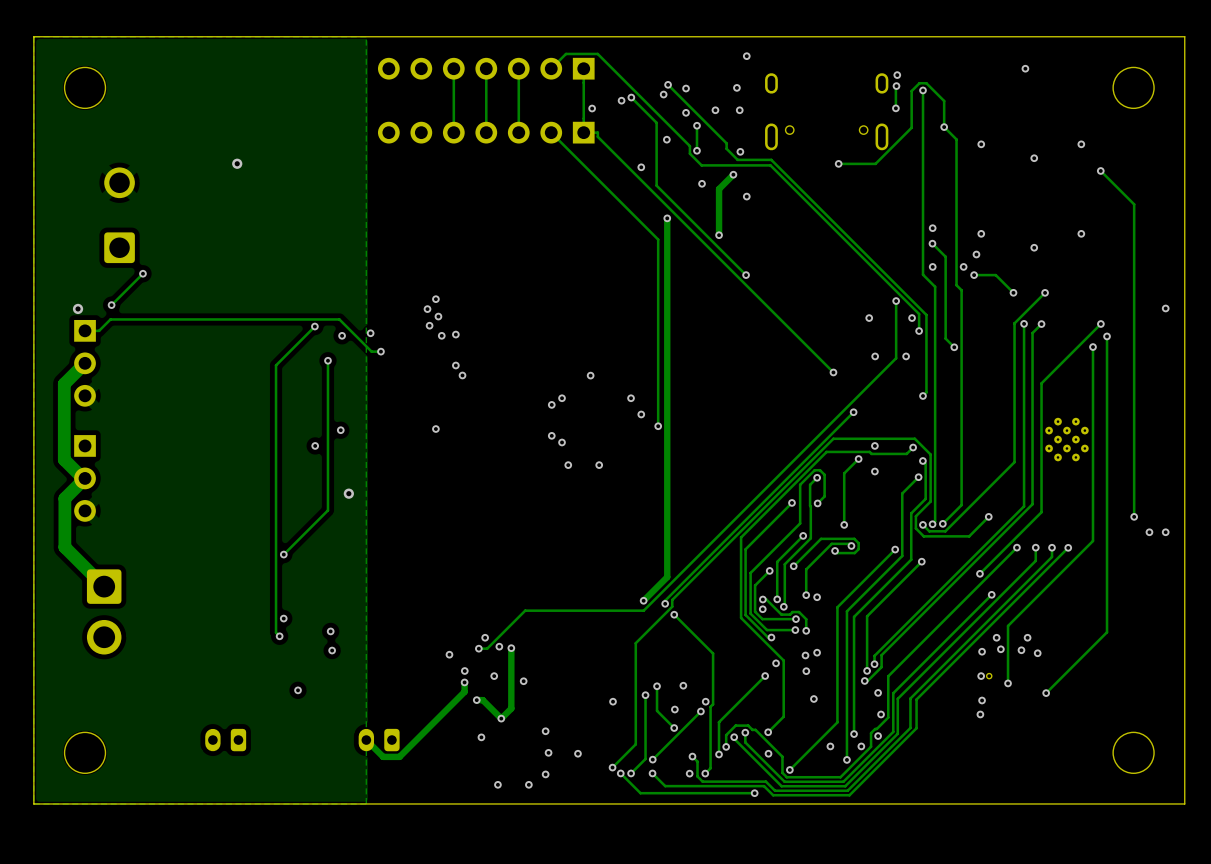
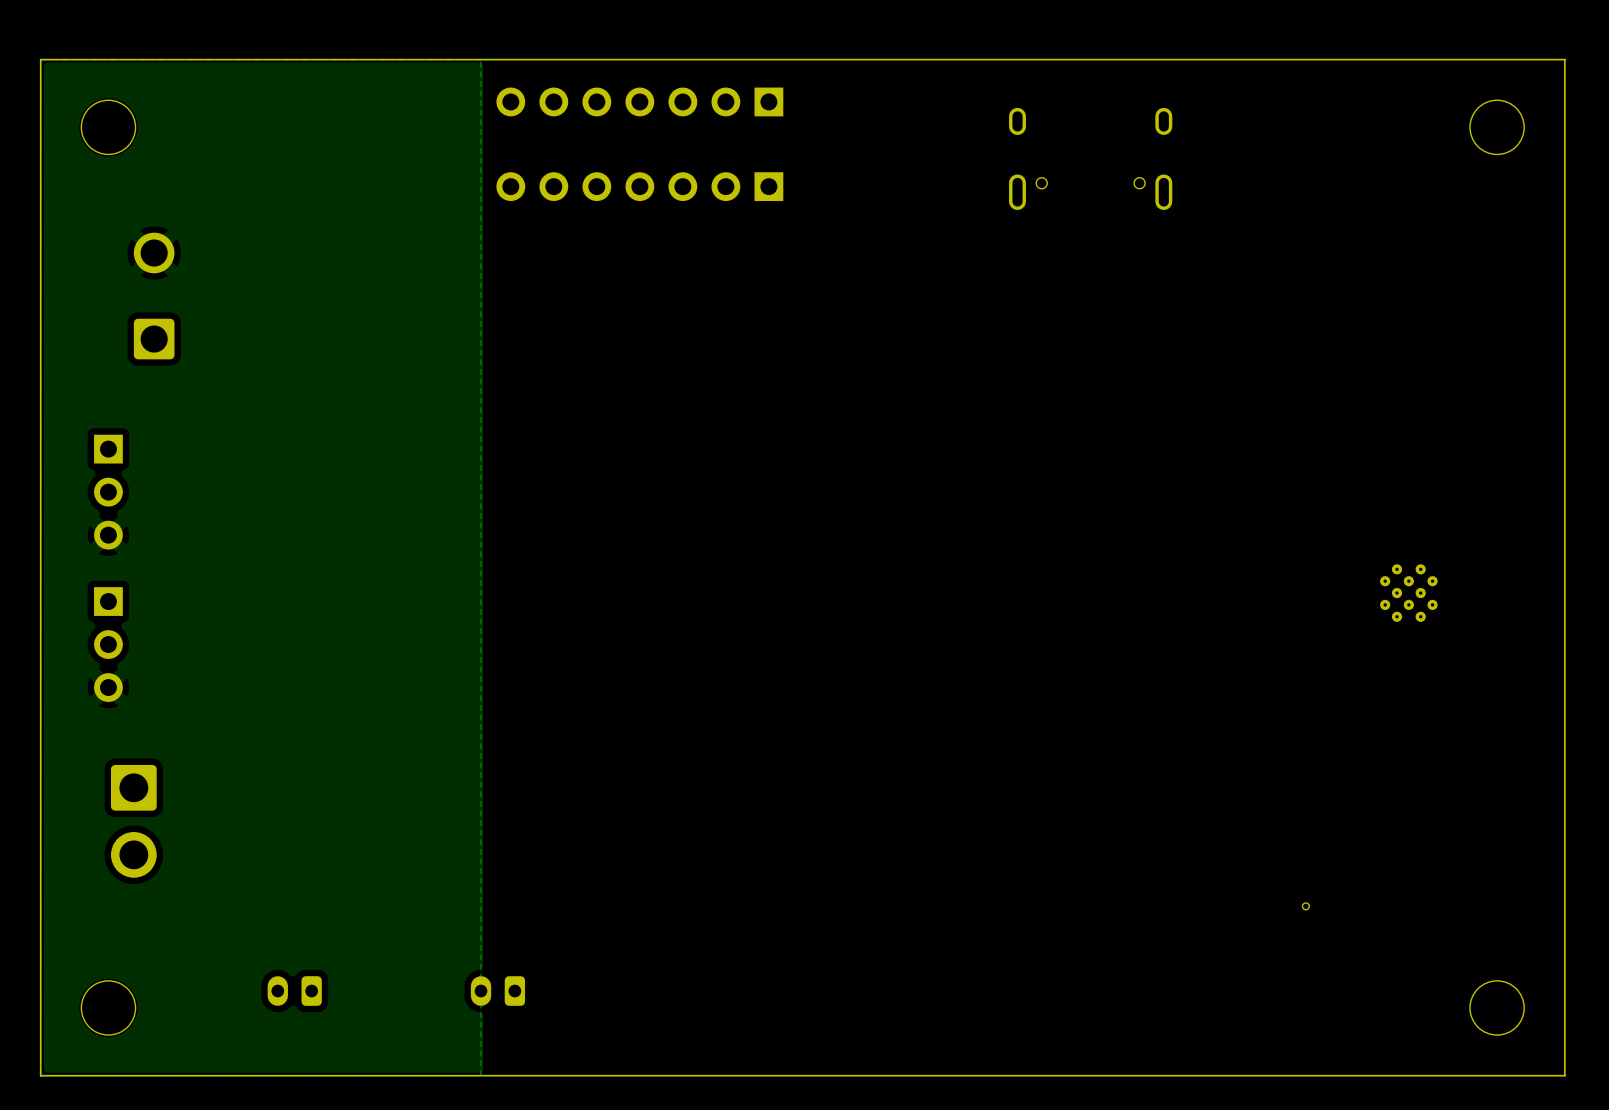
via: (746, 56) -> none
track: (453, 68) (453, 132) -> none
track: (486, 68) (486, 132) -> none
track: (518, 68) (518, 132) -> none
track: (551, 68) (566, 53) (597, 53) (689, 146) (689, 153) (701, 165) (770, 165) (919, 314) (919, 331) -> none
track: (583, 68) (583, 132) (597, 132) (597, 136) (833, 372) -> none
via: (1025, 68) -> none
via: (897, 75) -> none
track: (668, 84) (726, 143) (726, 148) (737, 159) (771, 159) (926, 315) (926, 392) (922, 396) -> none
via: (668, 84) -> none
track: (896, 86) (895, 108) -> none
via: (896, 86) -> none
via: (736, 87) -> none
via: (686, 88) -> none
track: (923, 90) (923, 274) (935, 286) (935, 521) (932, 524) -> none
via: (923, 90) -> none
via: (663, 94) -> none
track: (631, 97) (656, 122) (656, 185) (746, 275) -> none
via: (631, 97) -> none
via: (621, 100) -> none
via: (592, 108) -> none
via: (895, 108) -> none
via: (715, 110) -> none
via: (739, 110) -> none
via: (686, 112) -> none
track: (696, 125) (696, 150) -> none
via: (697, 125) -> none
via: (944, 127) -> none
track: (551, 132) (658, 239) (658, 426) -> none
via: (666, 139) -> none
via: (981, 144) -> none
via: (1081, 144) -> none
via: (696, 150) -> none
via: (740, 151) -> none
via: (1034, 158) -> none
via: (237, 163) -> none
track: (838, 163) (875, 163) (911, 127) (911, 91) (919, 83) (926, 83) (944, 101) (944, 127) (956, 139) (956, 285) (961, 290) (961, 505) (942, 523) -> none
via: (838, 163) -> none
via: (641, 167) -> none
track: (1100, 170) (1134, 204) (1134, 516) -> none
via: (1100, 170) -> none
track: (733, 174) (719, 189) (719, 235) -> none
via: (733, 174) -> none
via: (702, 183) -> none
via: (746, 196) -> none
track: (667, 218) (667, 577) (643, 600) -> none
via: (667, 218) -> none
via: (932, 228) -> none
via: (981, 233) -> none
via: (1081, 233) -> none
via: (719, 235) -> none
track: (932, 243) (945, 256) (945, 338) (954, 347) -> none
via: (932, 243) -> none
via: (1034, 247) -> none
via: (976, 254) -> none
via: (932, 266) -> none
via: (963, 266) -> none
track: (142, 273) (111, 305) -> none
via: (142, 273) -> none
via: (746, 275) -> none
track: (974, 275) (995, 275) (1013, 292) -> none
via: (974, 275) -> none
via: (1013, 292) -> none
track: (1045, 292) (1014, 323) (1014, 462) (945, 531) (929, 531) (922, 524) -> none
via: (1045, 292) -> none
via: (435, 299) -> none
track: (896, 301) (896, 358) (643, 610) (525, 610) (487, 648) (478, 648) -> none
via: (896, 301) -> none
via: (111, 305) -> none
via: (78, 308) -> none
via: (1165, 308) -> none
via: (427, 309) -> none
via: (438, 316) -> none
via: (869, 318) -> none
via: (912, 318) -> none
track: (1024, 323) (1024, 506) (874, 655) (874, 664) -> none
via: (1024, 323) -> none
track: (1100, 323) (1041, 383) (1041, 512) (979, 573) -> none
via: (1100, 323) -> none
track: (1041, 324) (1032, 333) (1032, 504) (881, 655) (881, 667) (867, 680) (864, 680) -> none
via: (1041, 324) -> none
via: (429, 325) -> none
track: (314, 326) (276, 365) (276, 632) (279, 636) -> none
via: (314, 326) -> none
track: (85, 330) (99, 330) (110, 319) (339, 319) (371, 351) (380, 351) -> none
via: (919, 331) -> none
via: (370, 333) -> none
via: (455, 334) -> none
via: (342, 335) -> none
via: (441, 335) -> none
track: (1107, 336) (1107, 632) (1046, 693) -> none
via: (1107, 336) -> none
via: (954, 347) -> none
track: (1093, 347) (1093, 540) (1008, 625) (1008, 683) -> none
via: (1093, 347) -> none
via: (380, 351) -> none
via: (875, 356) -> none
via: (906, 356) -> none
track: (327, 360) (327, 510) (283, 554) -> none
via: (327, 360) -> none
track: (85, 363) (64, 384) (64, 459) (84, 479) -> none
via: (455, 365) -> none
via: (833, 372) -> none
via: (462, 375) -> none
via: (590, 375) -> none
via: (922, 396) -> none
via: (562, 398) -> none
via: (631, 398) -> none
via: (551, 404) -> none
track: (853, 412) (665, 600) (665, 603) -> none
via: (853, 412) -> none
via: (641, 414) -> none
via: (658, 426) -> none
via: (435, 429) -> none
via: (340, 430) -> none
via: (551, 435) -> none
via: (562, 442) -> none
via: (315, 445) -> none
via: (874, 445) -> none
track: (913, 447) (906, 453) (826, 451) (741, 537) (741, 617) (783, 660) (783, 716) (768, 732) -> none
via: (913, 447) -> none
track: (858, 459) (844, 473) (844, 524) -> none
via: (858, 459) -> none
track: (922, 460) (925, 463) (925, 498) (911, 513) (911, 559) (854, 616) (854, 734) -> none
via: (922, 460) -> none
via: (568, 465) -> none
via: (599, 465) -> none
via: (874, 471) -> none
track: (817, 477) (810, 484) (810, 538) (784, 564) (783, 606) -> none
via: (817, 477) -> none
track: (918, 477) (902, 493) (902, 556) (846, 611) (846, 759) -> none
via: (918, 477) -> none
track: (84, 479) (64, 498) (64, 547) (104, 586) -> none
via: (348, 493) -> none
track: (791, 502) (745, 549) (745, 615) (768, 637) (771, 637) -> none
via: (791, 502) -> none
track: (817, 503) (824, 496) (824, 474) (820, 470) (814, 470) (800, 484) (800, 523) (750, 573) (750, 613) (767, 630) (795, 630) -> none
via: (817, 503) -> none
track: (988, 516) (969, 536) (923, 536) (915, 528) (915, 516) (930, 501) (930, 454) (914, 438) (833, 438) (672, 599) (672, 606) (635, 643) (635, 744) (612, 767) -> none
via: (988, 516) -> none
via: (1134, 516) -> none
via: (942, 523) -> none
via: (844, 524) -> none
via: (922, 524) -> none
via: (932, 524) -> none
via: (1149, 532) -> none
via: (1165, 532) -> none
track: (803, 535) (777, 561) (777, 599) -> none
via: (803, 535) -> none
track: (851, 545) (849, 543) (831, 543) (806, 569) (806, 595) -> none
via: (851, 545) -> none
track: (1016, 547) (888, 676) (888, 717) (871, 733) (871, 746) (840, 777) (786, 777) (782, 772) (782, 756) (755, 729) (752, 729) (748, 725) (735, 725) (726, 735) (726, 746) -> none
via: (1016, 547) -> none
track: (1035, 547) (1035, 560) (897, 698) (897, 733) (845, 786) (781, 786) (734, 737) -> none
via: (1035, 547) -> none
track: (1052, 547) (1052, 556) (910, 698) (910, 727) (847, 790) (775, 790) (765, 781) (702, 781) (697, 776) (697, 761) (692, 756) -> none
via: (1052, 547) -> none
track: (1068, 547) (916, 699) (916, 728) (849, 795) (773, 795) (764, 786) (665, 786) (652, 773) -> none
via: (1068, 547) -> none
track: (895, 549) (837, 607) (837, 722) (789, 769) -> none
via: (895, 549) -> none
track: (835, 550) (837, 553) (854, 553) (858, 549) (858, 543) (854, 538) (821, 538) (793, 566) -> none
via: (835, 550) -> none
via: (283, 554) -> none
track: (921, 561) (867, 616) (867, 670) -> none
via: (921, 561) -> none
via: (793, 566) -> none
track: (769, 570) (755, 585) (755, 611) (762, 619) (795, 619) -> none
via: (769, 570) -> none
via: (979, 573) -> none
track: (991, 594) (893, 693) (893, 731) (843, 781) (784, 781) (745, 742) (745, 732) -> none
via: (991, 594) -> none
via: (806, 595) -> none
via: (817, 597) -> none
track: (762, 599) (766, 599) (781, 614) (799, 612) (806, 619) (806, 630) -> none
via: (762, 599) -> none
via: (777, 599) -> none
via: (643, 600) -> none
via: (665, 603) -> none
via: (783, 606) -> none
via: (762, 609) -> none
track: (674, 614) (713, 653) (710, 768) (705, 773) -> none
via: (674, 614) -> none
via: (283, 618) -> none
via: (795, 619) -> none
via: (795, 630) -> none
via: (806, 630) -> none
via: (330, 631) -> none
via: (279, 636) -> none
via: (485, 637) -> none
via: (771, 637) -> none
via: (996, 637) -> none
via: (1027, 637) -> none
via: (499, 646) -> none
via: (478, 648) -> none
track: (511, 648) (511, 708) (501, 718) (482, 700) (476, 700) -> none
via: (511, 648) -> none
via: (1000, 649) -> none
via: (332, 650) -> none
via: (1021, 650) -> none
via: (982, 651) -> none
via: (817, 652) -> none
via: (1037, 653) -> none
via: (449, 654) -> none
via: (805, 655) -> none
via: (776, 663) -> none
via: (874, 664) -> none
via: (464, 670) -> none
via: (867, 670) -> none
via: (806, 671) -> none
via: (494, 676) -> none
track: (765, 676) (719, 722) (719, 754) -> none
via: (765, 676) -> none
via: (981, 676) -> none
via: (864, 680) -> none
via: (523, 681) -> none
track: (464, 682) (464, 691) (399, 756) (383, 756) (366, 740) -> none
via: (464, 682) -> none
via: (1008, 683) -> none
via: (683, 685) -> none
track: (657, 686) (657, 710) (674, 728) -> none
via: (657, 686) -> none
via: (298, 690) -> none
via: (878, 692) -> none
via: (1046, 693) -> none
track: (645, 695) (645, 758) (631, 773) -> none
via: (645, 695) -> none
via: (813, 699) -> none
via: (476, 700) -> none
via: (982, 700) -> none
via: (613, 701) -> none
via: (705, 701) -> none
via: (674, 709) -> none
track: (700, 711) (652, 759) -> none
via: (700, 711) -> none
via: (881, 714) -> none
via: (980, 714) -> none
via: (501, 718) -> none
via: (674, 728) -> none
via: (545, 731) -> none
via: (745, 732) -> none
via: (768, 732) -> none
via: (854, 734) -> none
via: (878, 736) -> none
via: (481, 737) -> none
via: (734, 737) -> none
via: (726, 746) -> none
via: (830, 746) -> none
via: (861, 746) -> none
via: (548, 752) -> none
via: (577, 753) -> none
via: (768, 753) -> none
via: (719, 754) -> none
via: (692, 756) -> none
via: (652, 759) -> none
via: (846, 759) -> none
via: (612, 767) -> none
via: (789, 769) -> none
track: (620, 773) (640, 793) (754, 793) -> none
via: (620, 773) -> none
via: (631, 773) -> none
via: (652, 773) -> none
via: (689, 773) -> none
via: (705, 773) -> none
via: (545, 774) -> none
via: (497, 784) -> none
via: (528, 784) -> none
via: (754, 793) -> none

